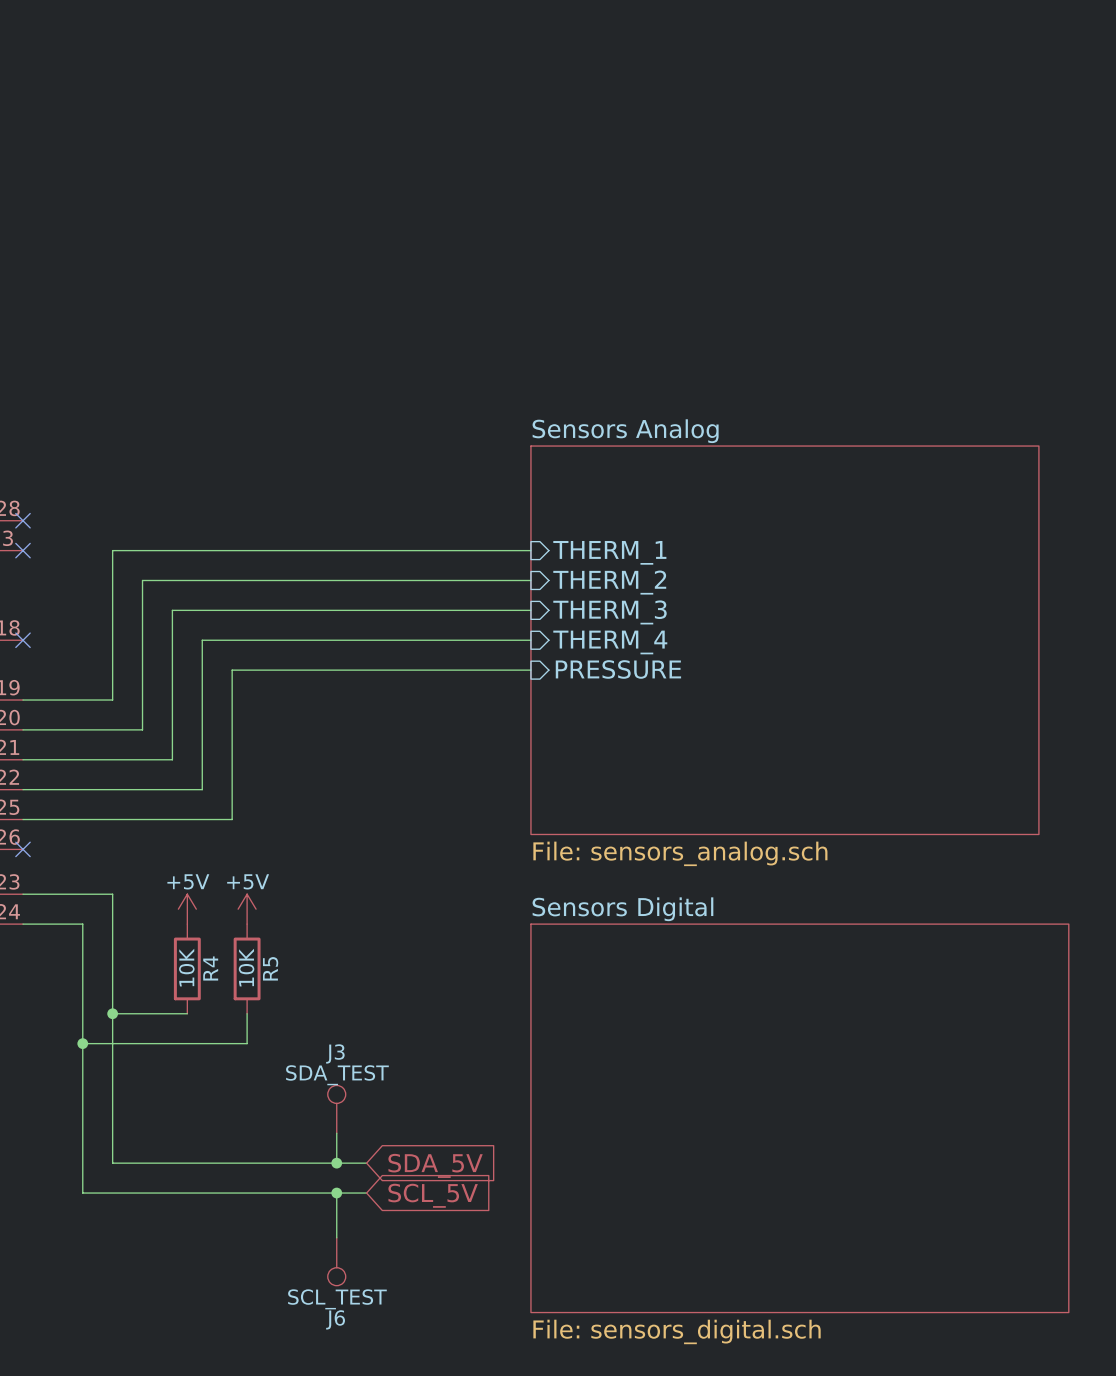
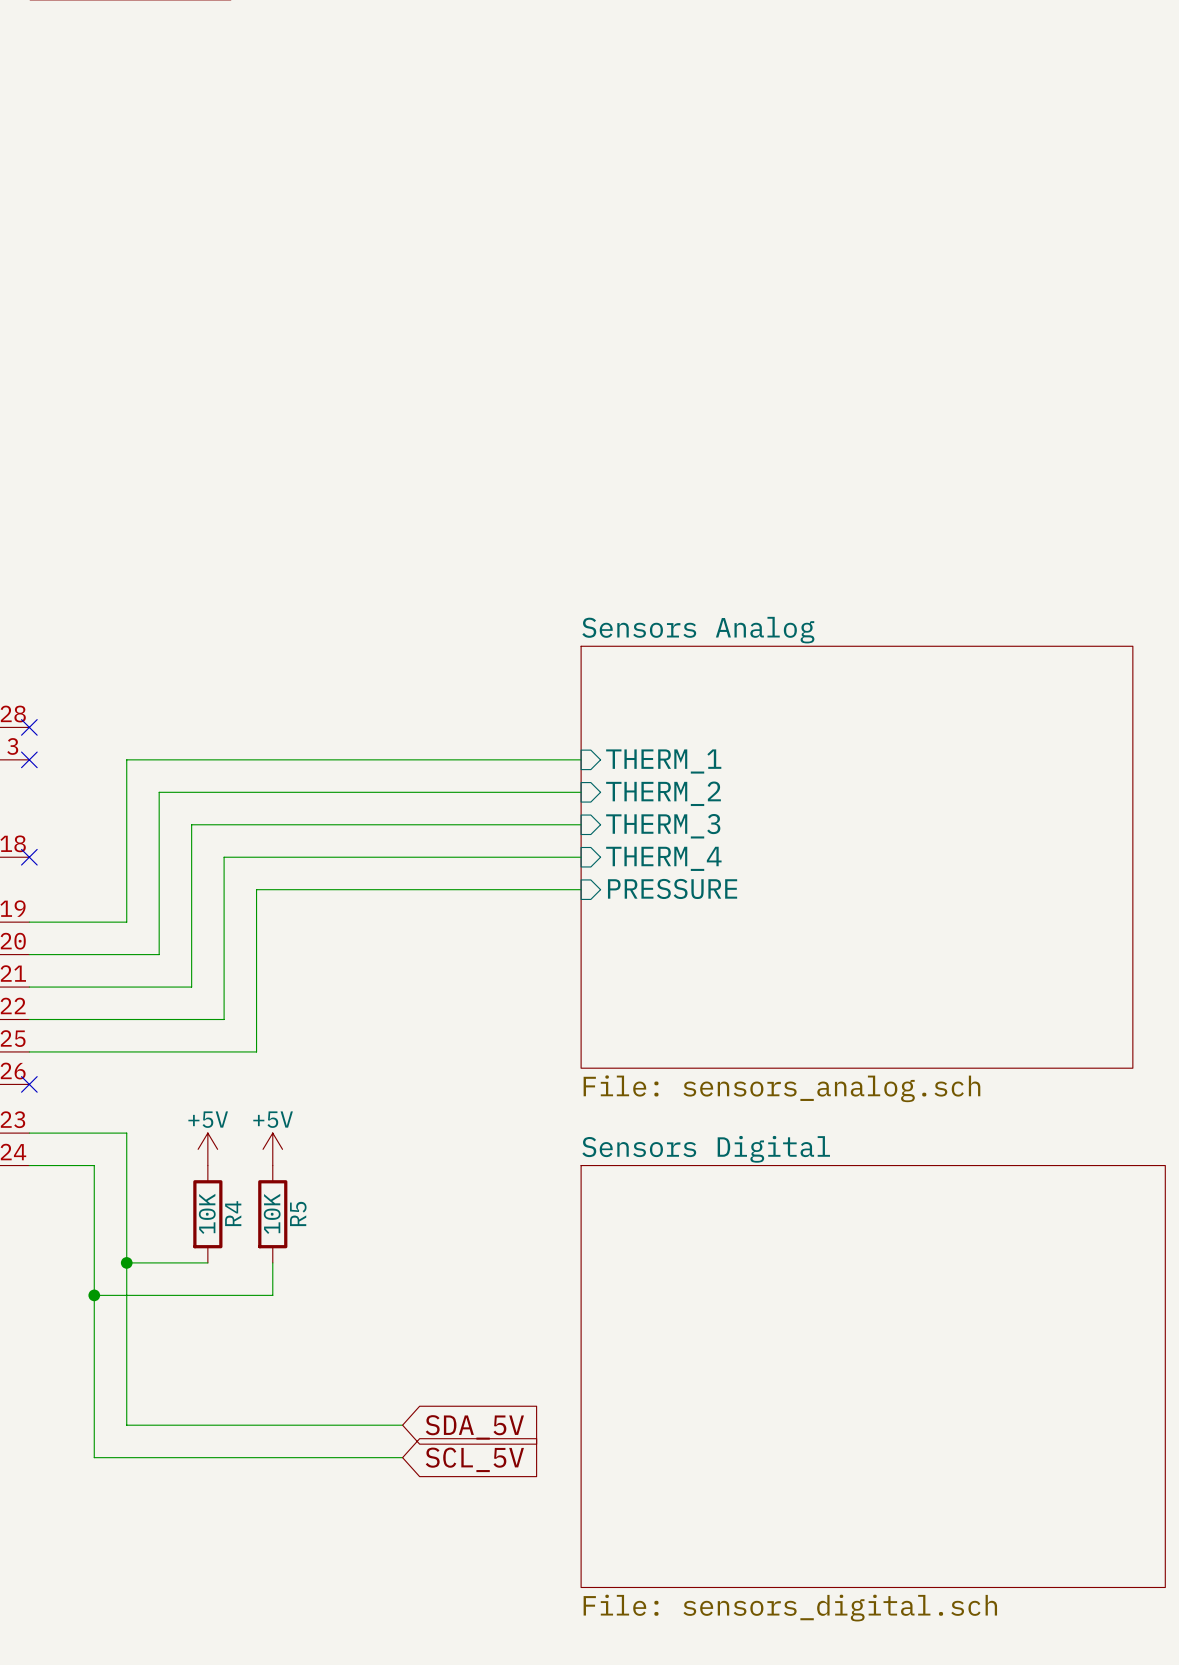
J3: SDA_TEST (336, 1109) -> none
wire: (336, 1133) (336, 1163) -> none
junction: (336, 1163) -> none
wire: (336, 1193) (336, 1237) -> none
junction: (336, 1193) -> none
J6: SCL_TEST (336, 1261) -> none

